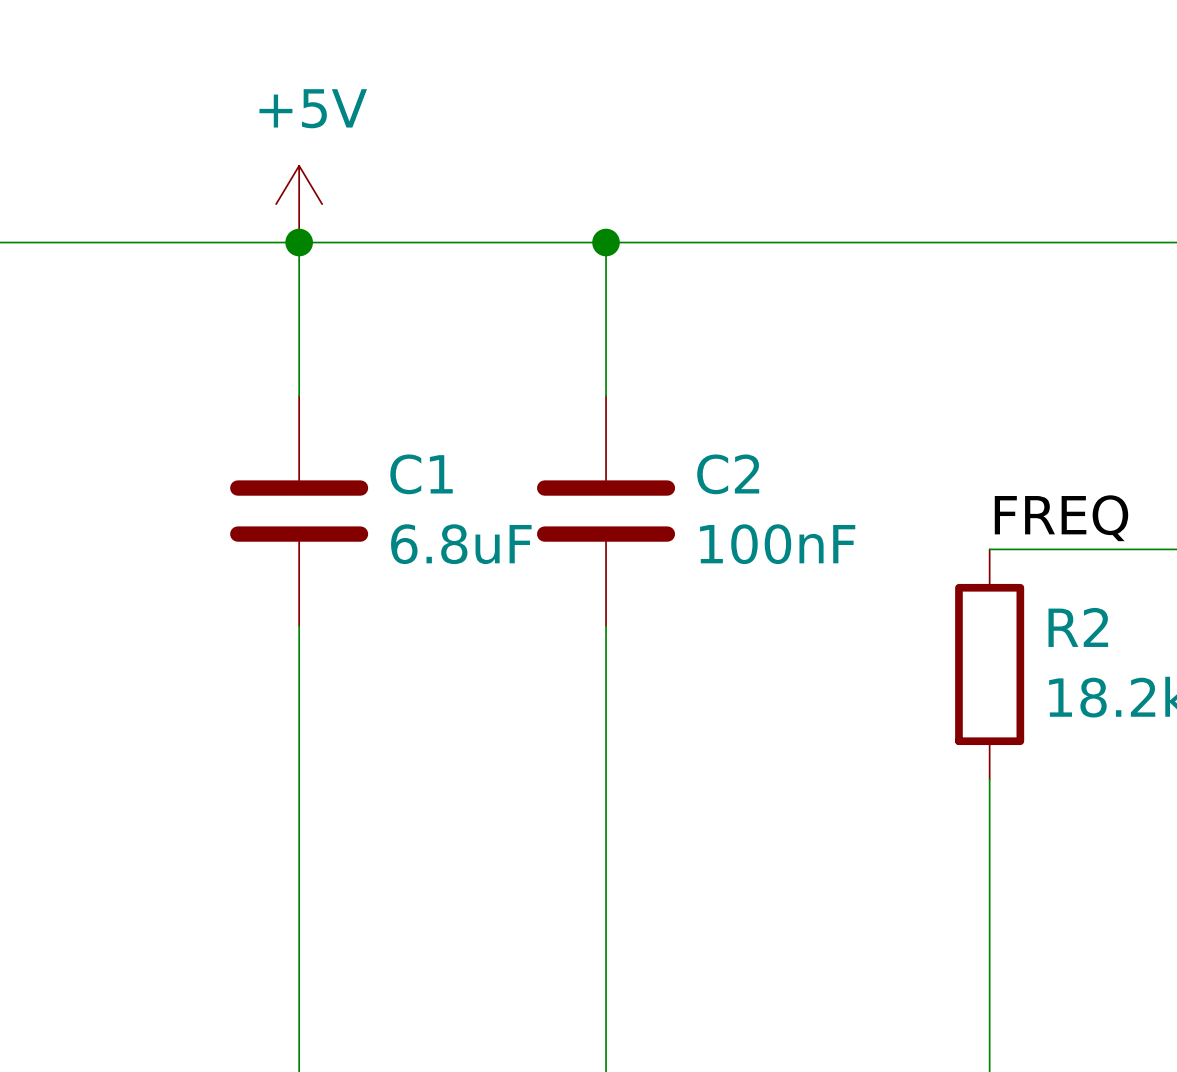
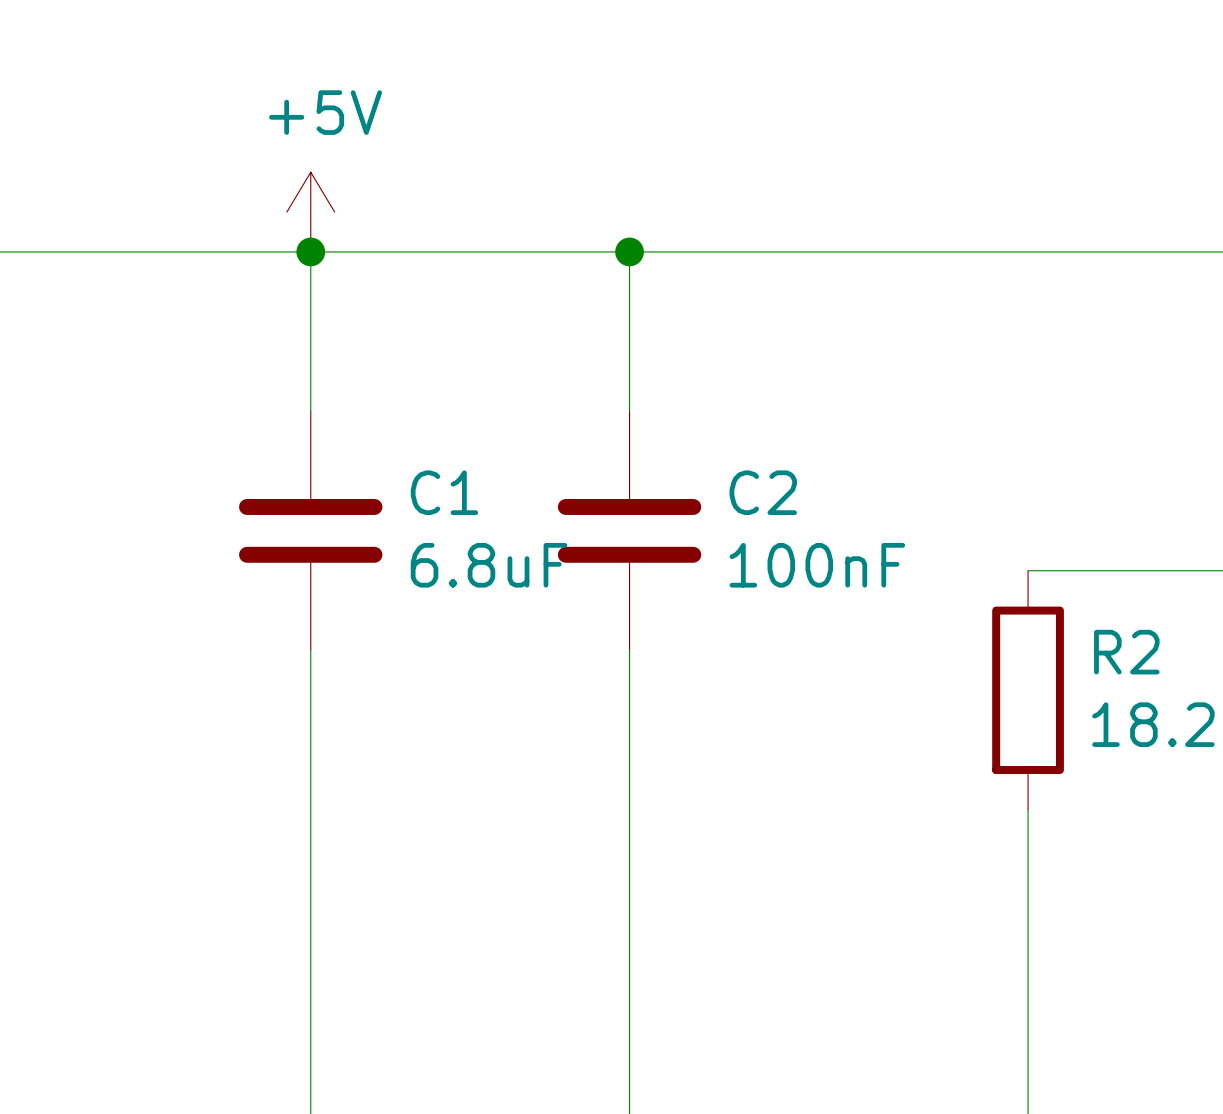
label: FREQ (1061, 518) -> none

